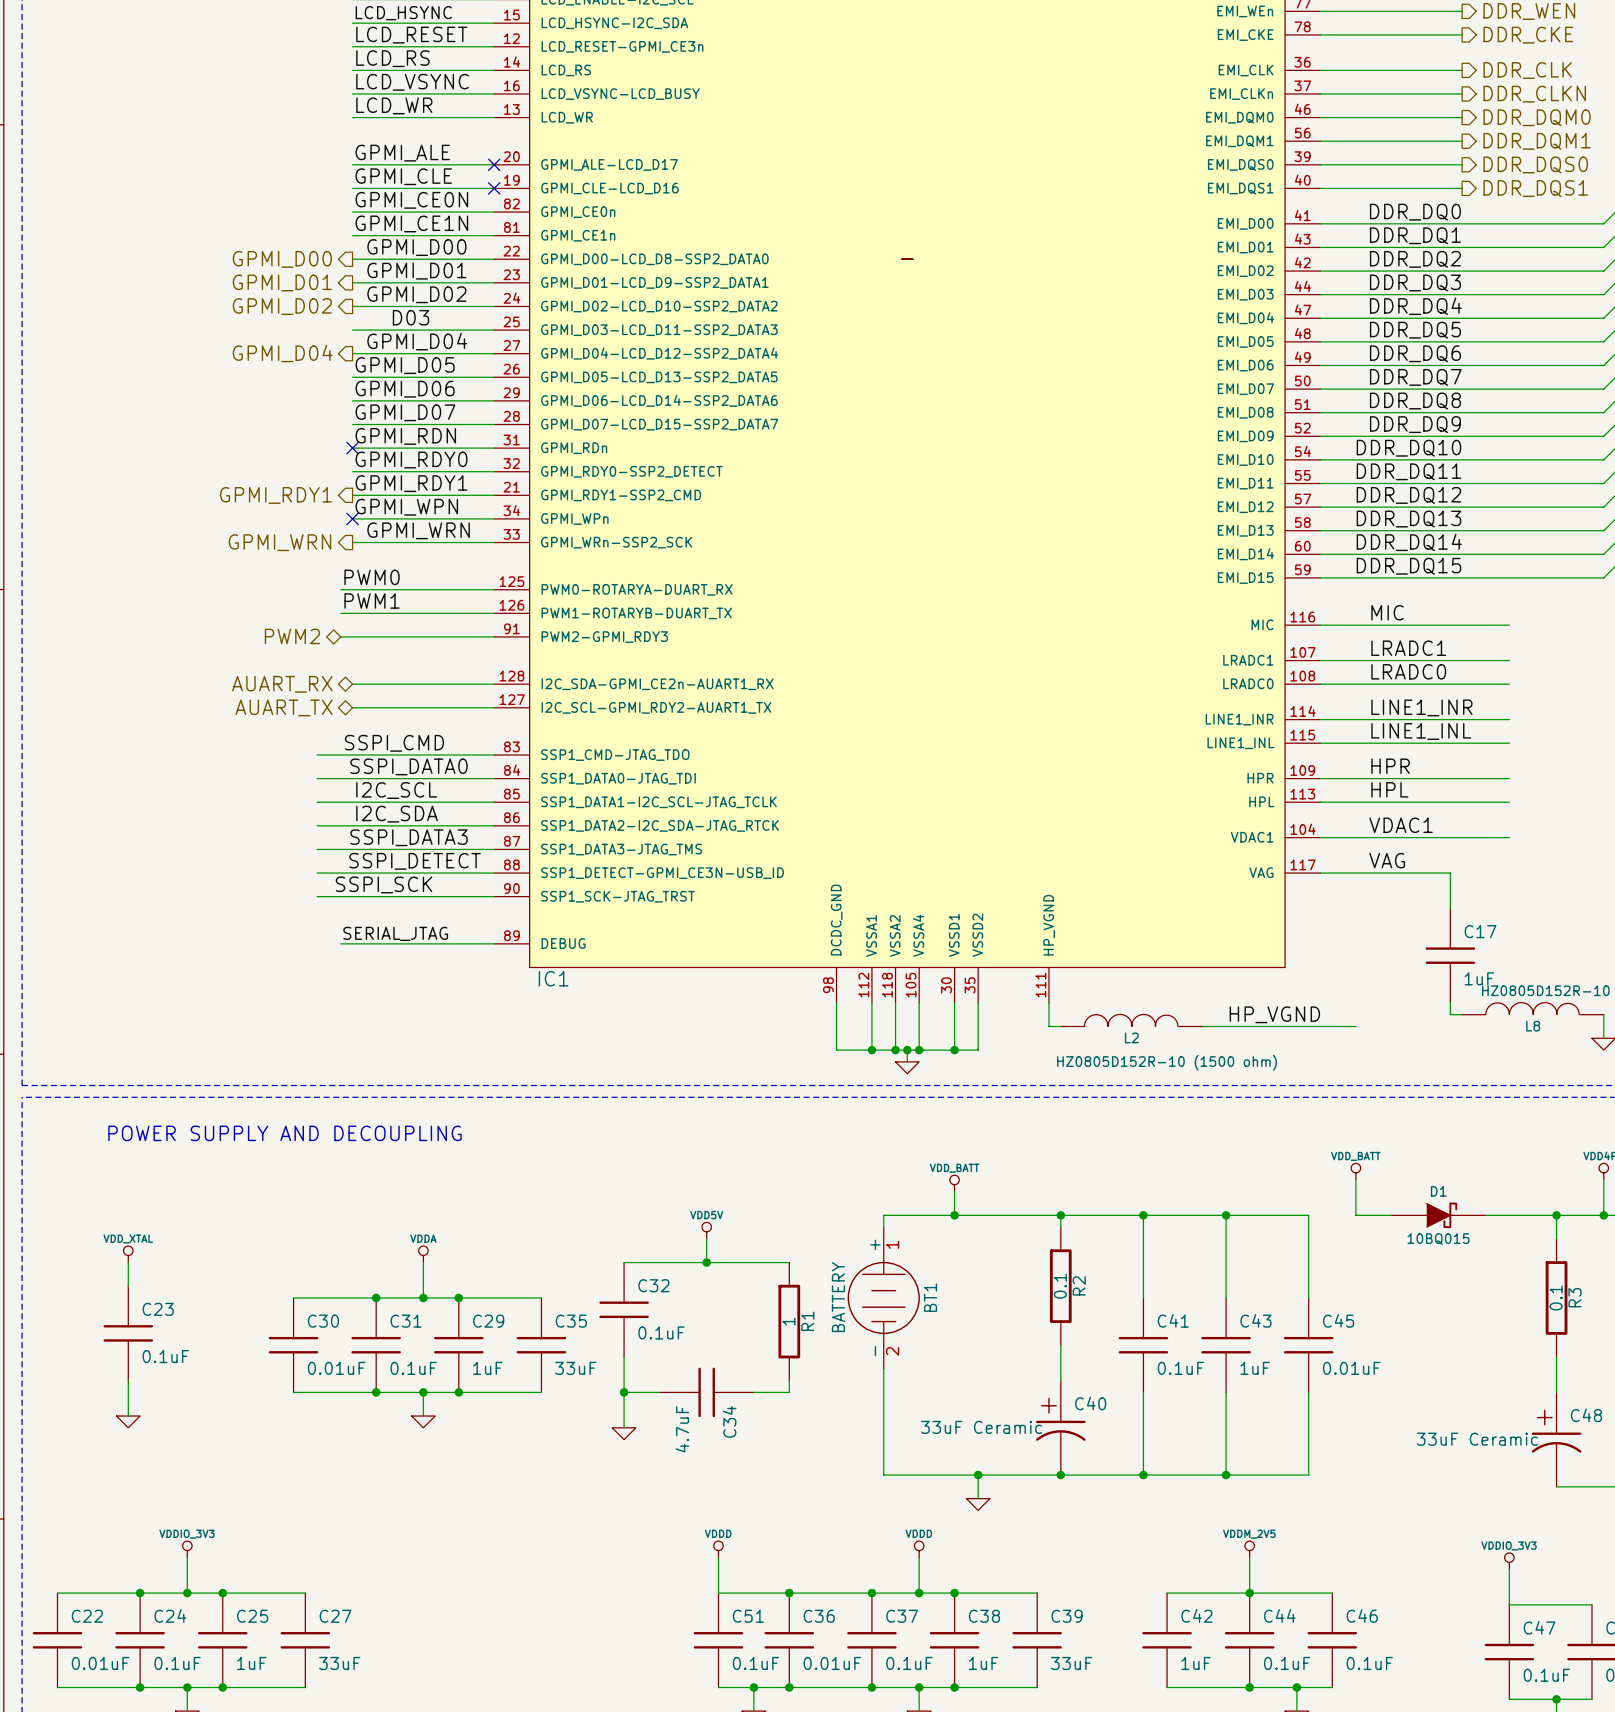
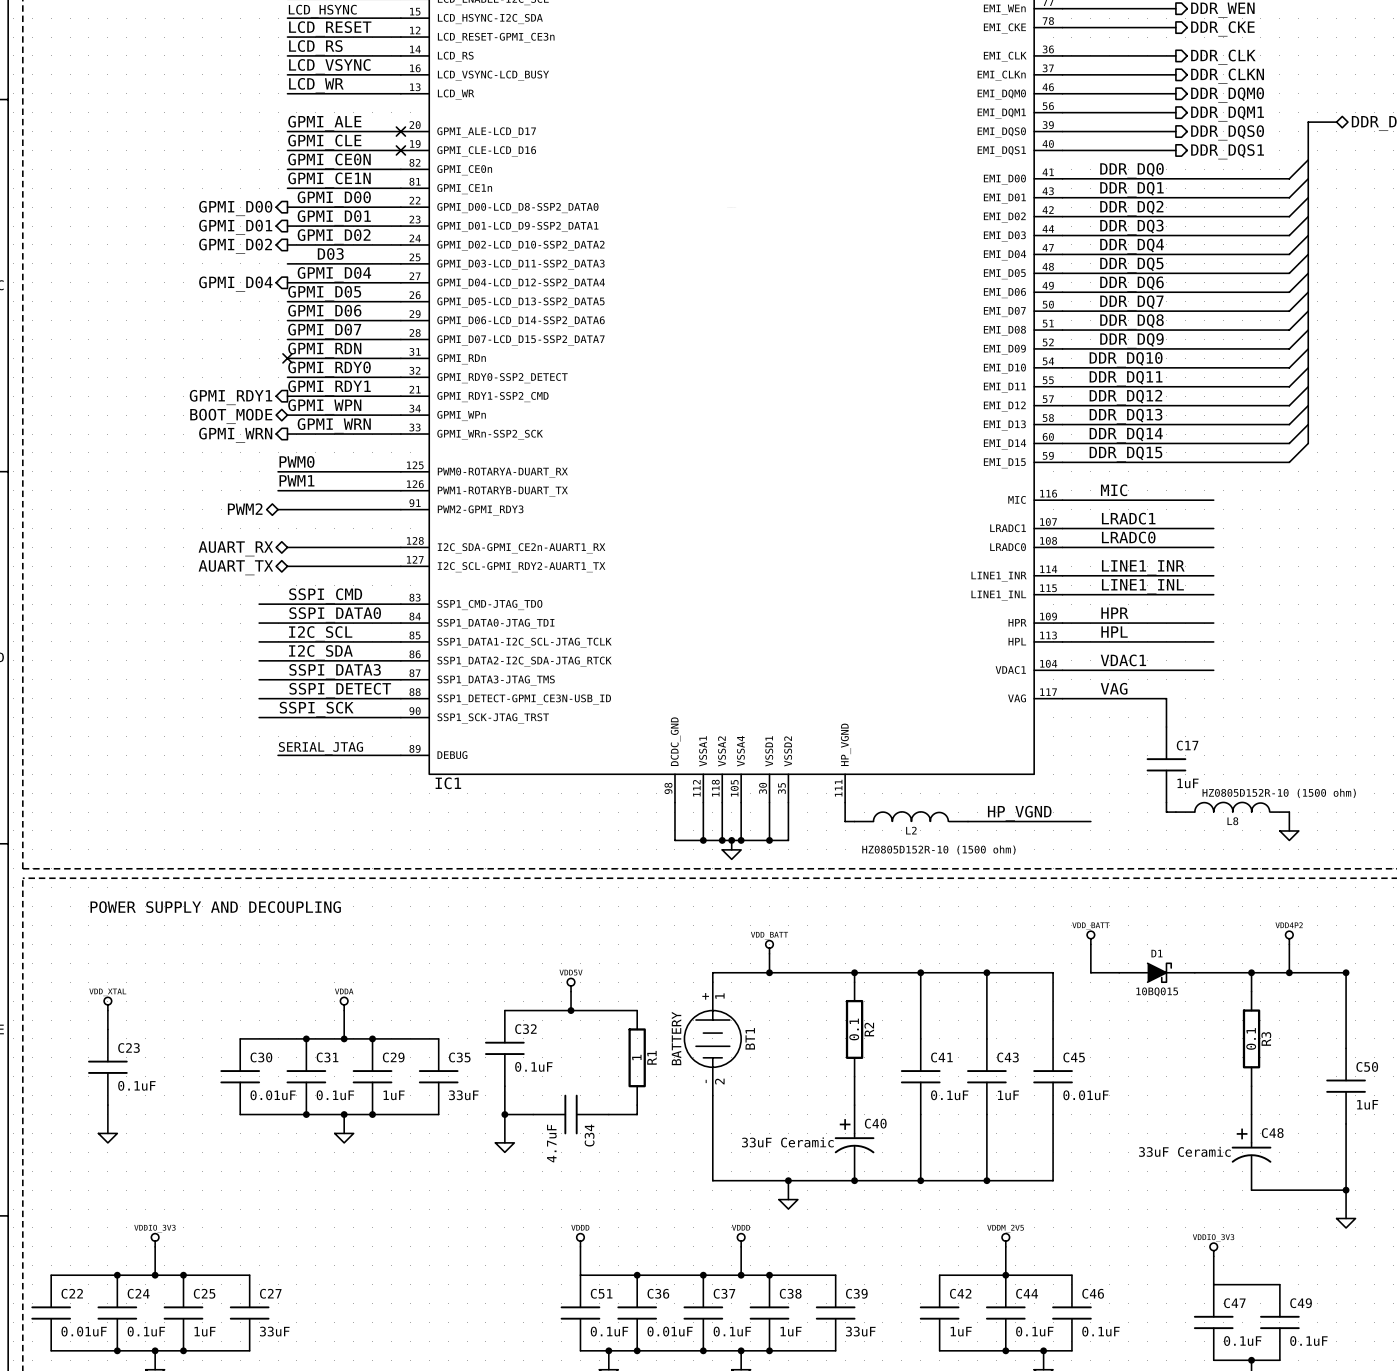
no-connect mark: (352, 518) -> none
hierarchical label: none -> BOOT_MODE (231, 416)

